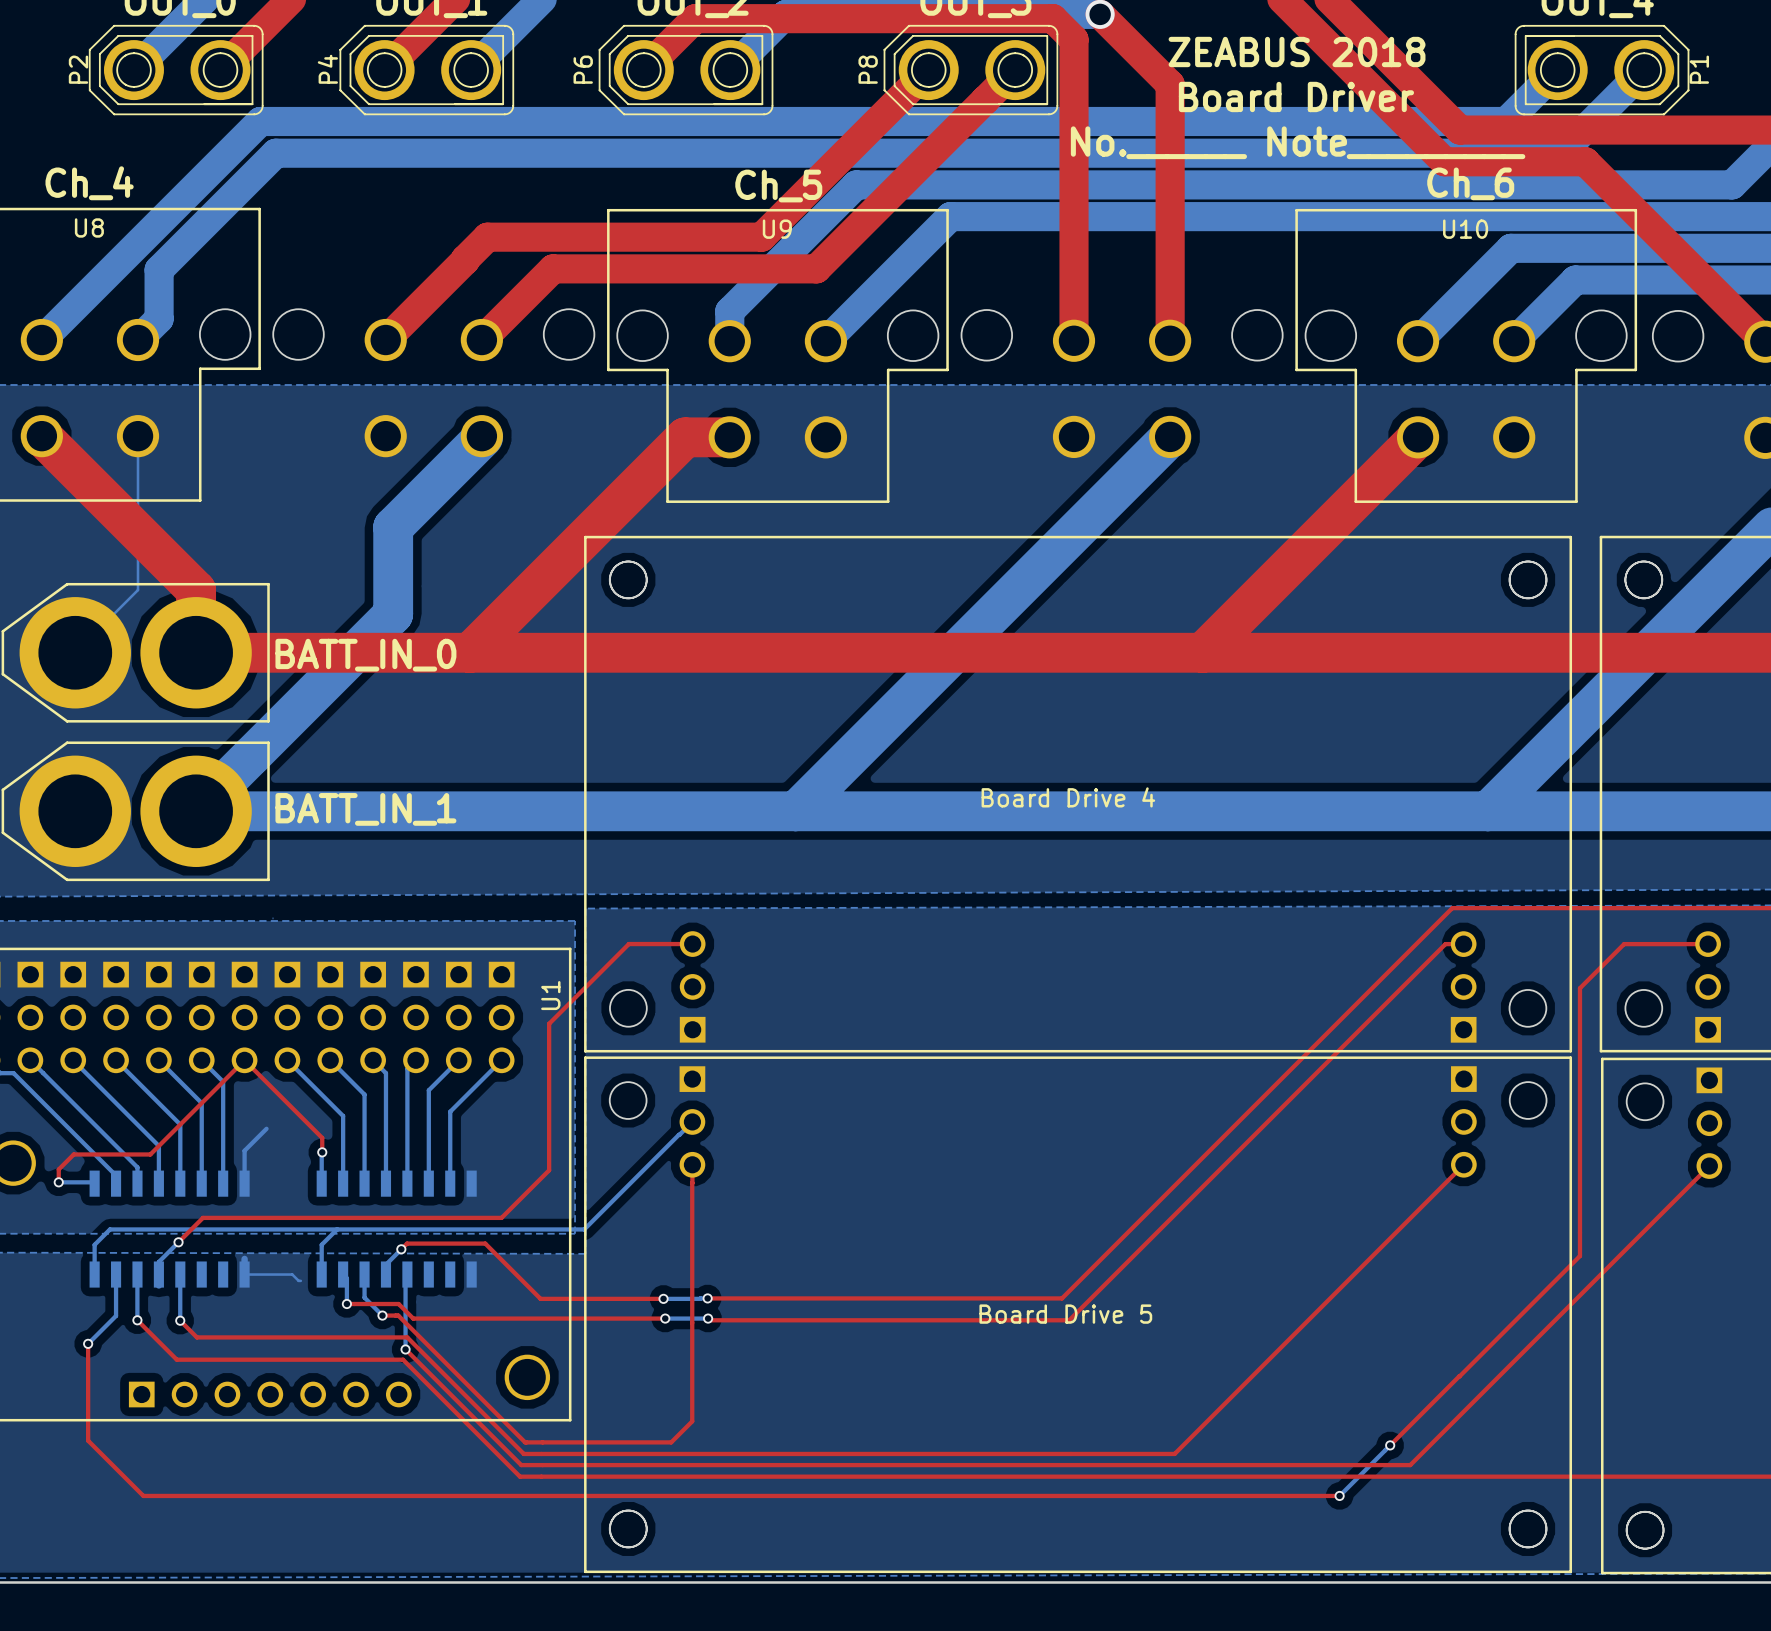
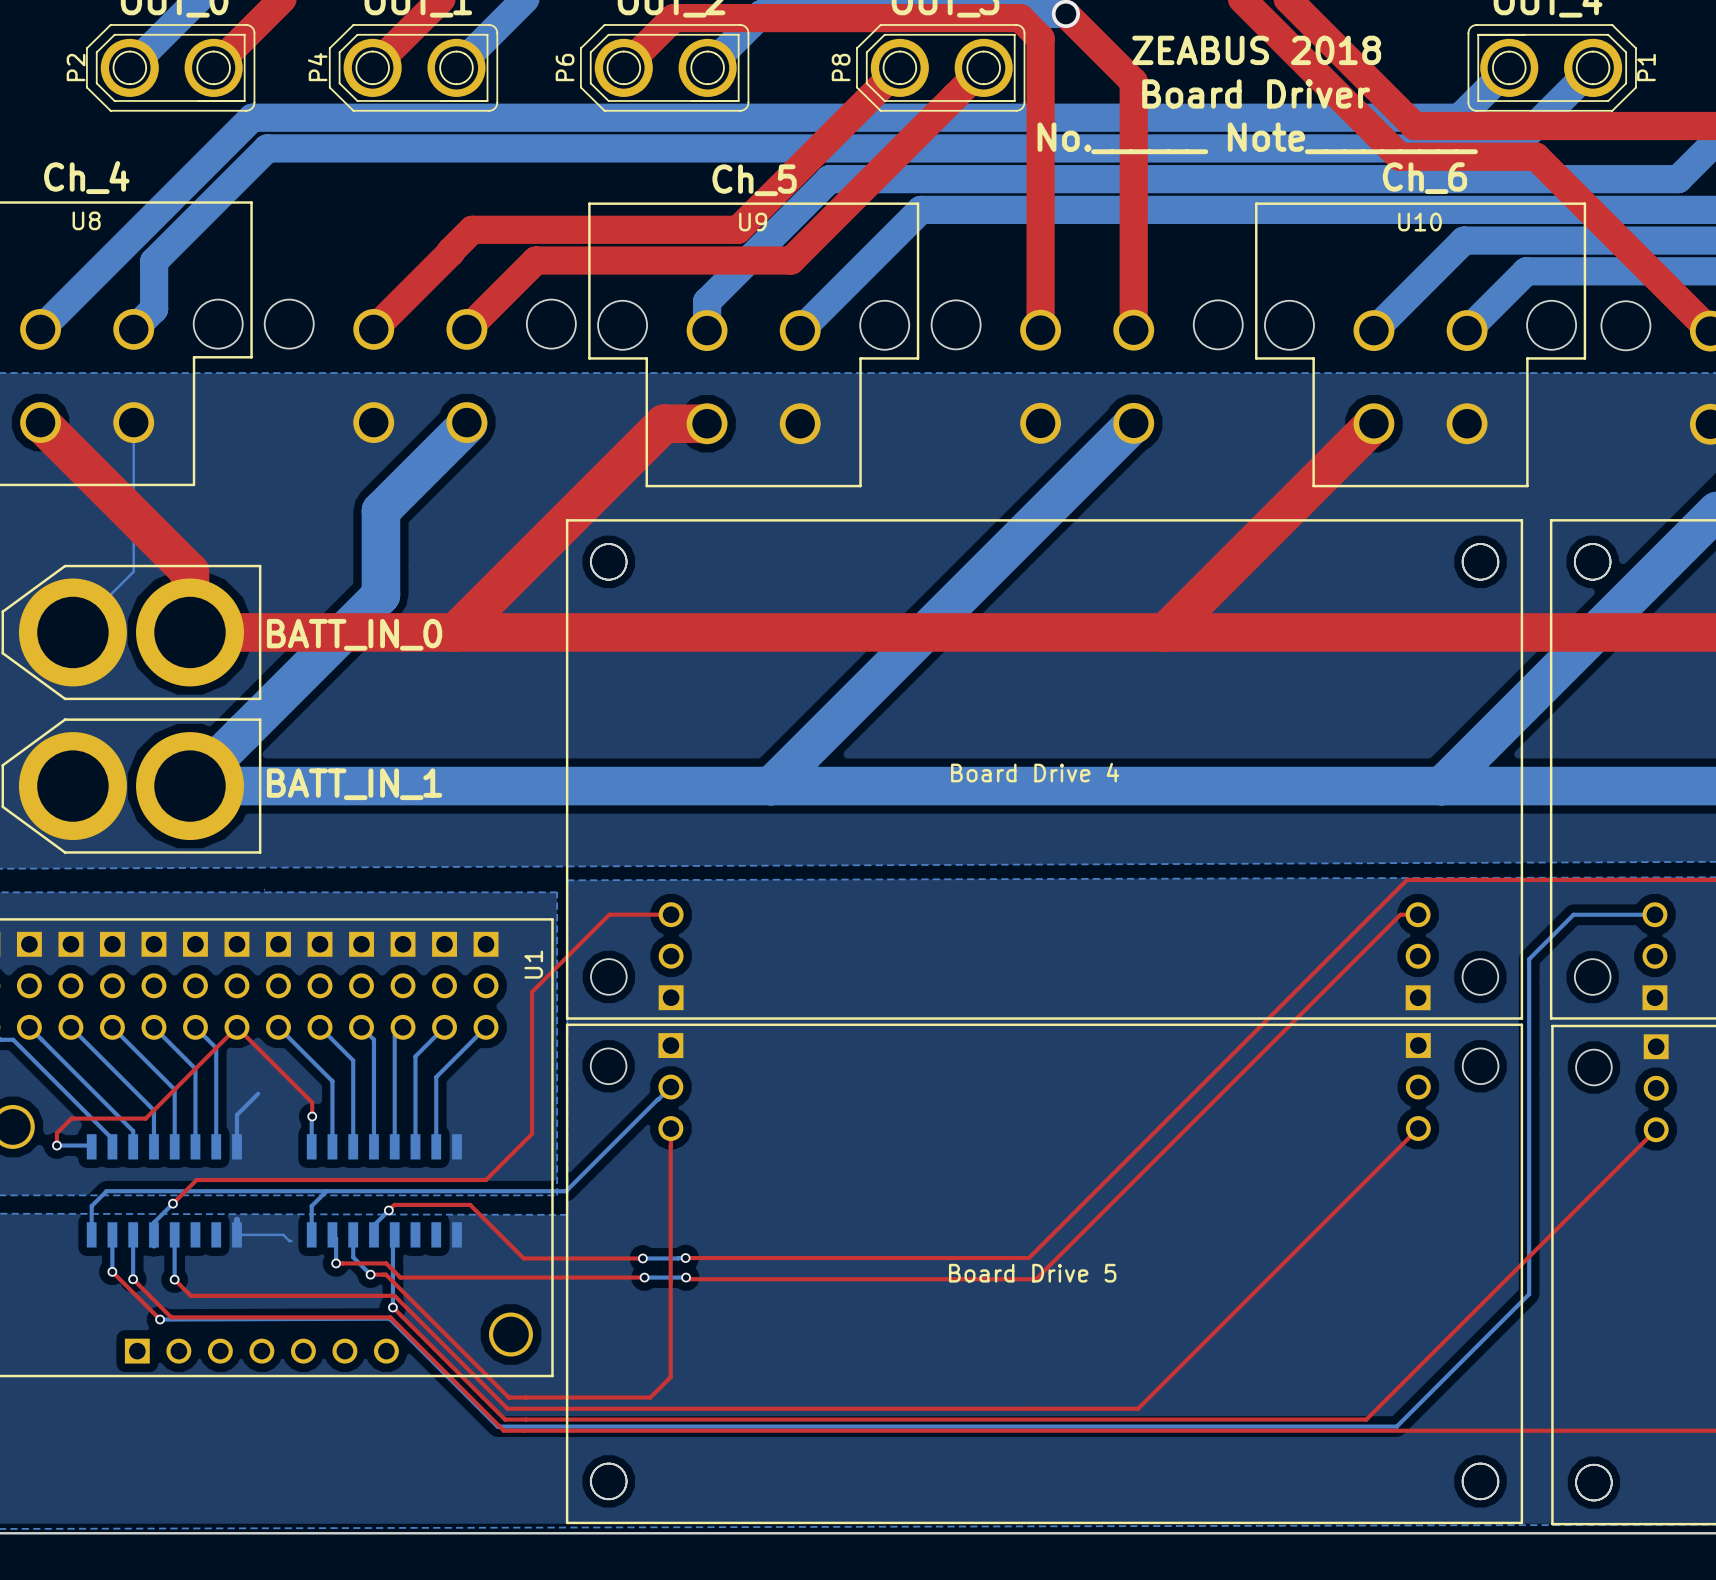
bottom track: none -> (1654, 914) (1573, 914) (1529, 959) (1529, 1294) (1396, 1426) (497, 1426) (389, 1318) (160, 1318)
top track: (1708, 944) (1624, 944) (1579, 988) (1579, 1256) (1390, 1445) -> none
bottom track: (116, 1274) (116, 1315) (88, 1343) -> (112, 1234) (112, 1271)
top track: none -> (112, 1271) (160, 1319)
via: none -> (112, 1271)
top track: (88, 1343) (88, 1440) (143, 1495) (1339, 1495) -> none
via: (88, 1343) -> none
via: none -> (160, 1319)
bottom track: (1390, 1445) (1339, 1495) -> none
via: (1390, 1445) -> none
via: (1339, 1495) -> none

